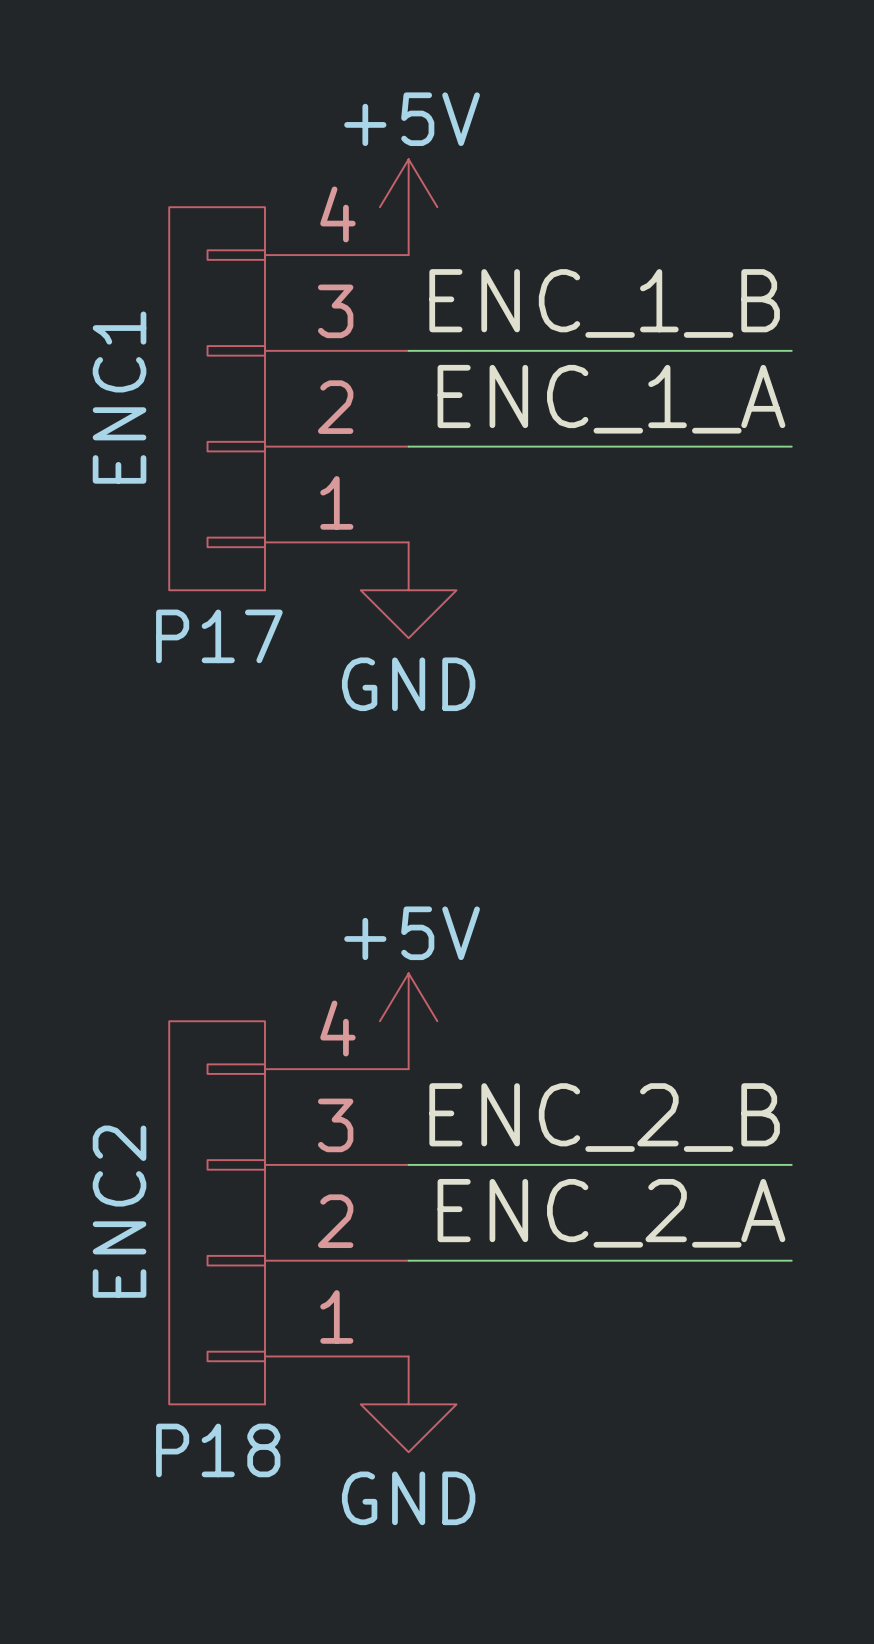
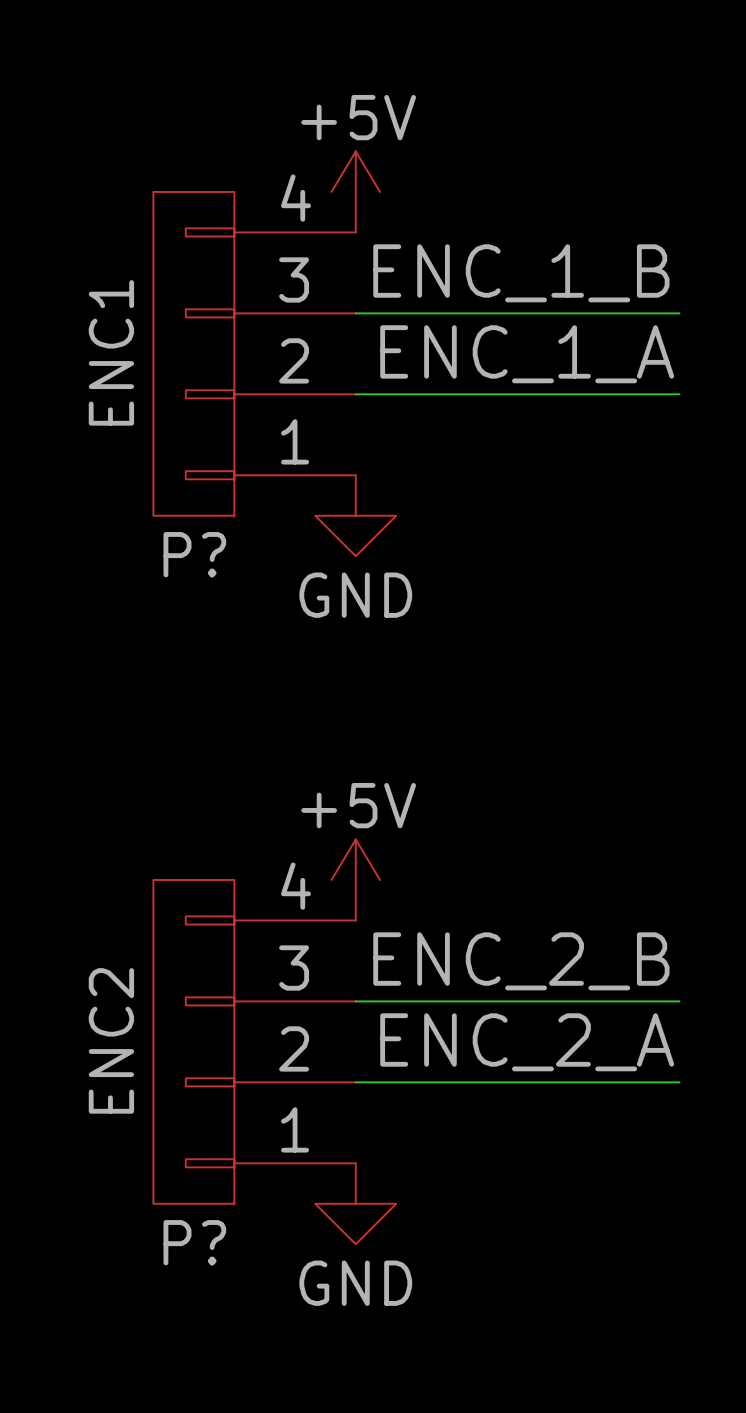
P17 name: P17 (219, 636) -> P? (194, 554)
P18 name: P18 (218, 1450) -> P? (194, 1242)

